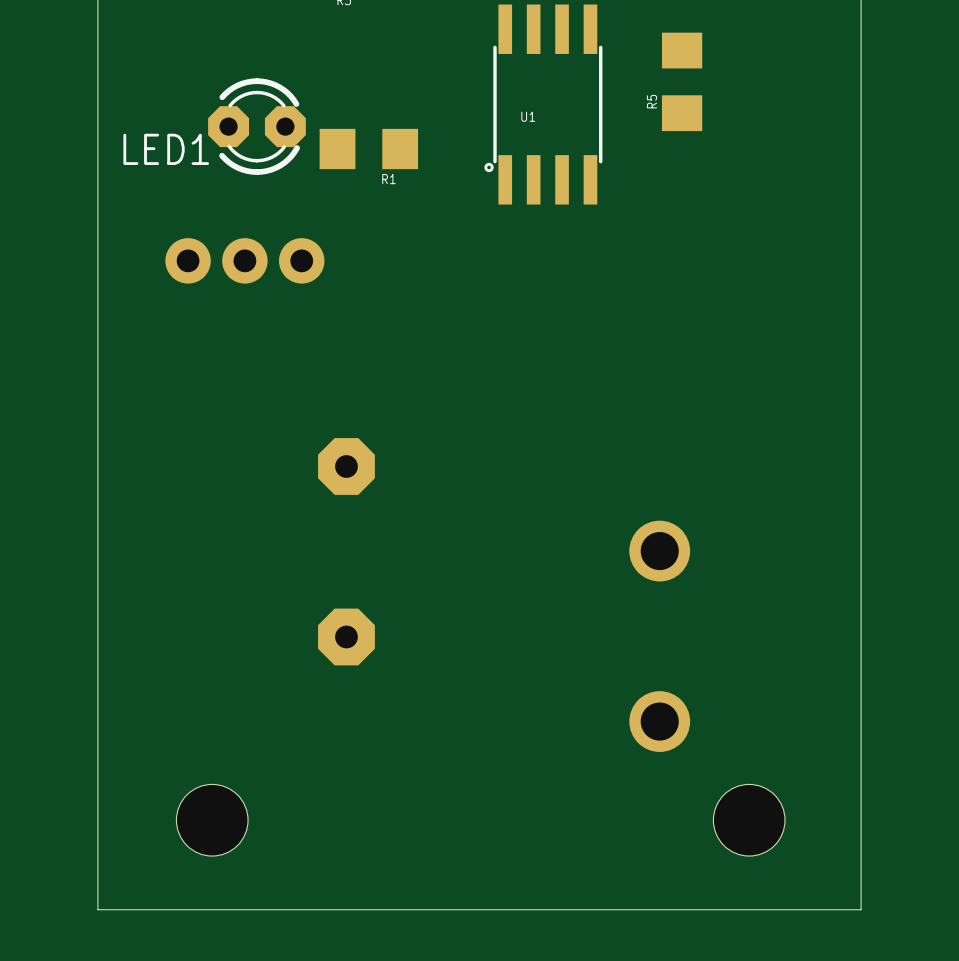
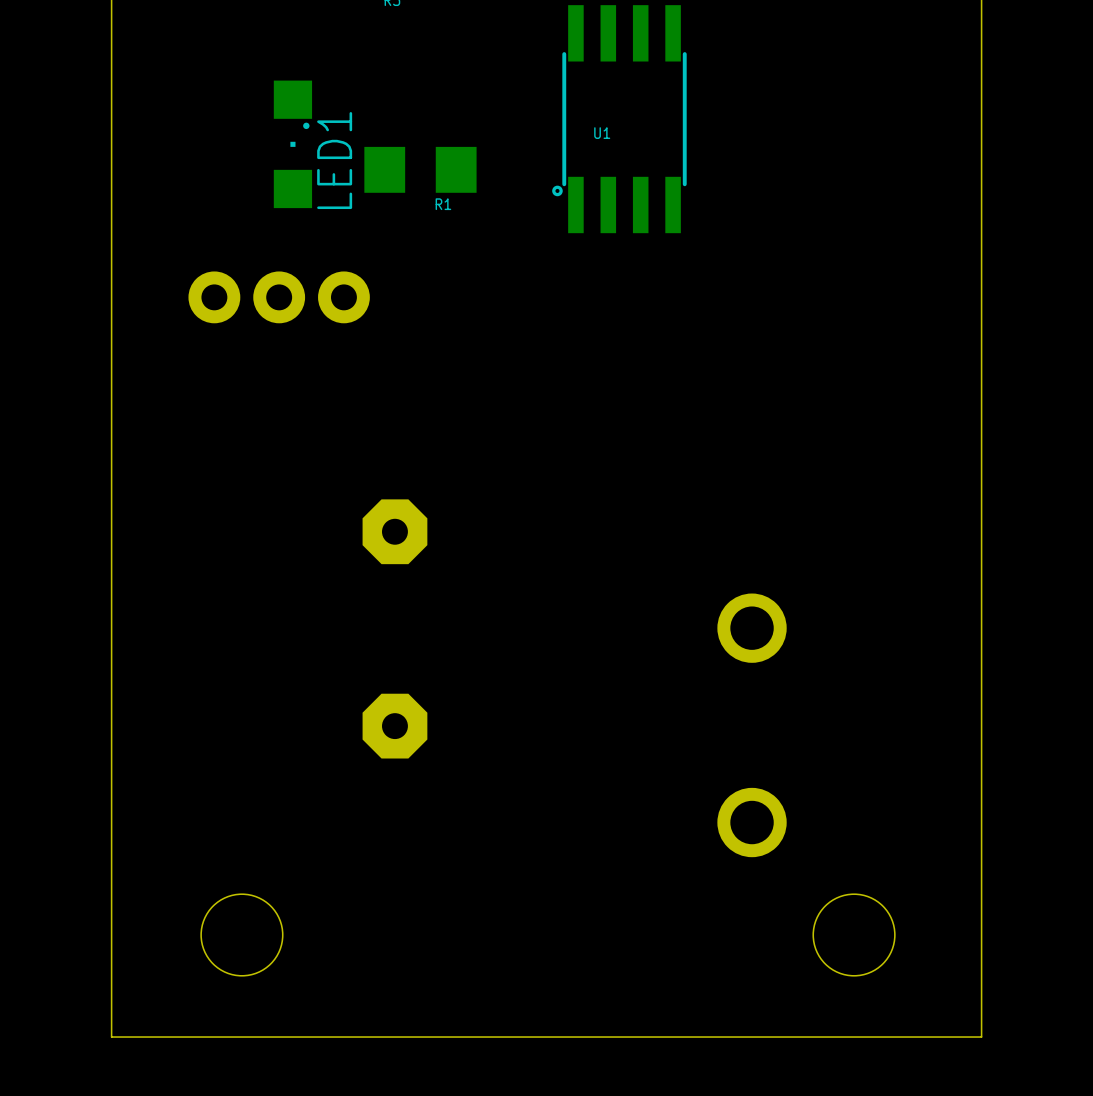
LED1 footprint: [208, 78, 306, 175] -> [273, 80, 313, 209]
R5: (682, 81) -> none
LED1 name position: LED1 (166, 149) -> LED1 (334, 160)

